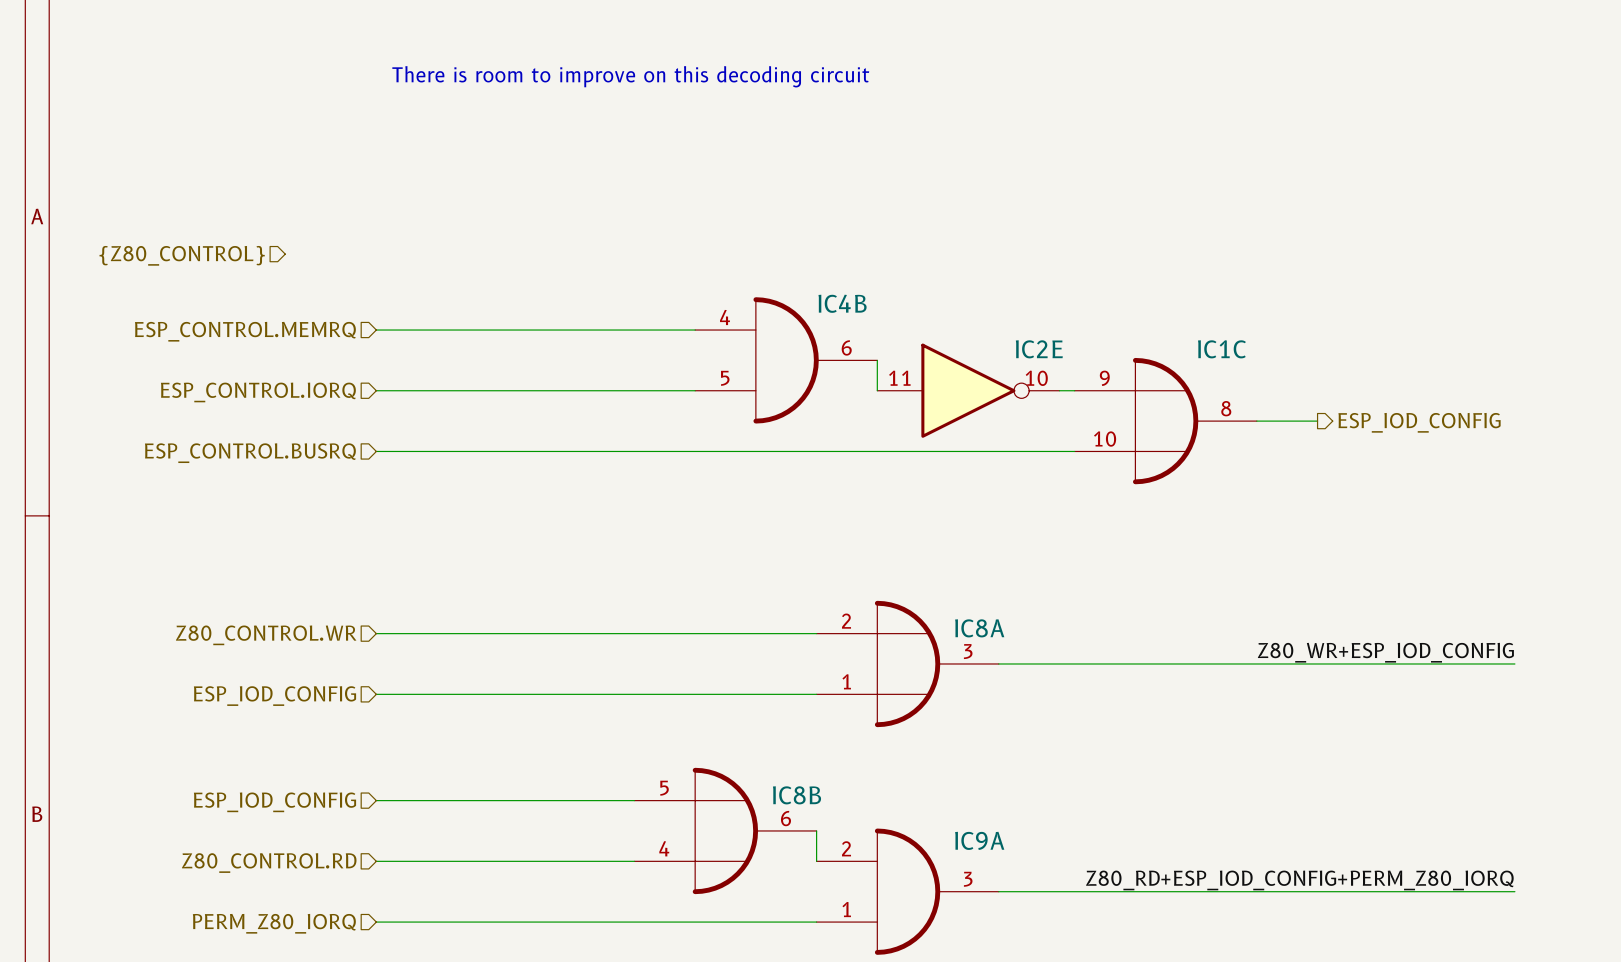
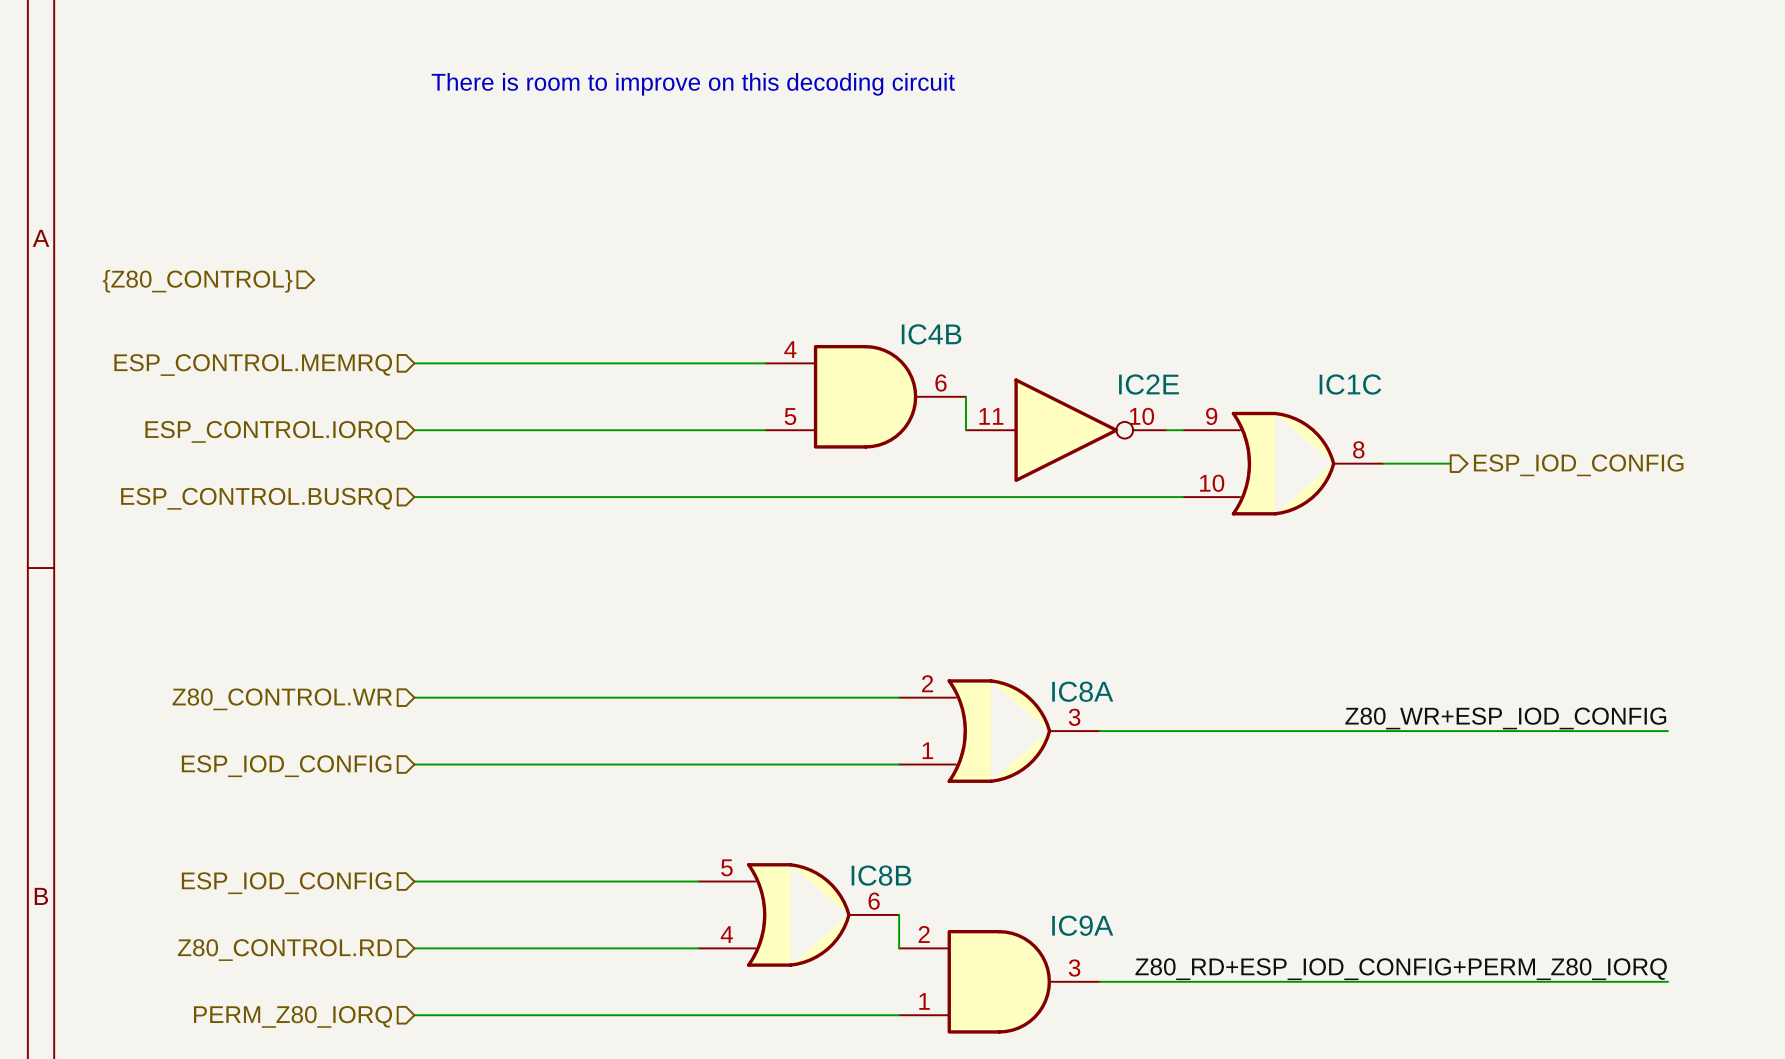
IC4B symbol: [695, 297, 878, 424] -> [765, 344, 966, 449]
IC1C symbol: [1074, 357, 1257, 485] -> [1183, 411, 1384, 516]
IC8A symbol: [816, 600, 999, 728] -> [899, 679, 1100, 783]
IC8B symbol: [634, 767, 817, 895] -> [698, 863, 900, 967]
IC9A symbol: [816, 828, 999, 955] -> [899, 929, 1100, 1034]

